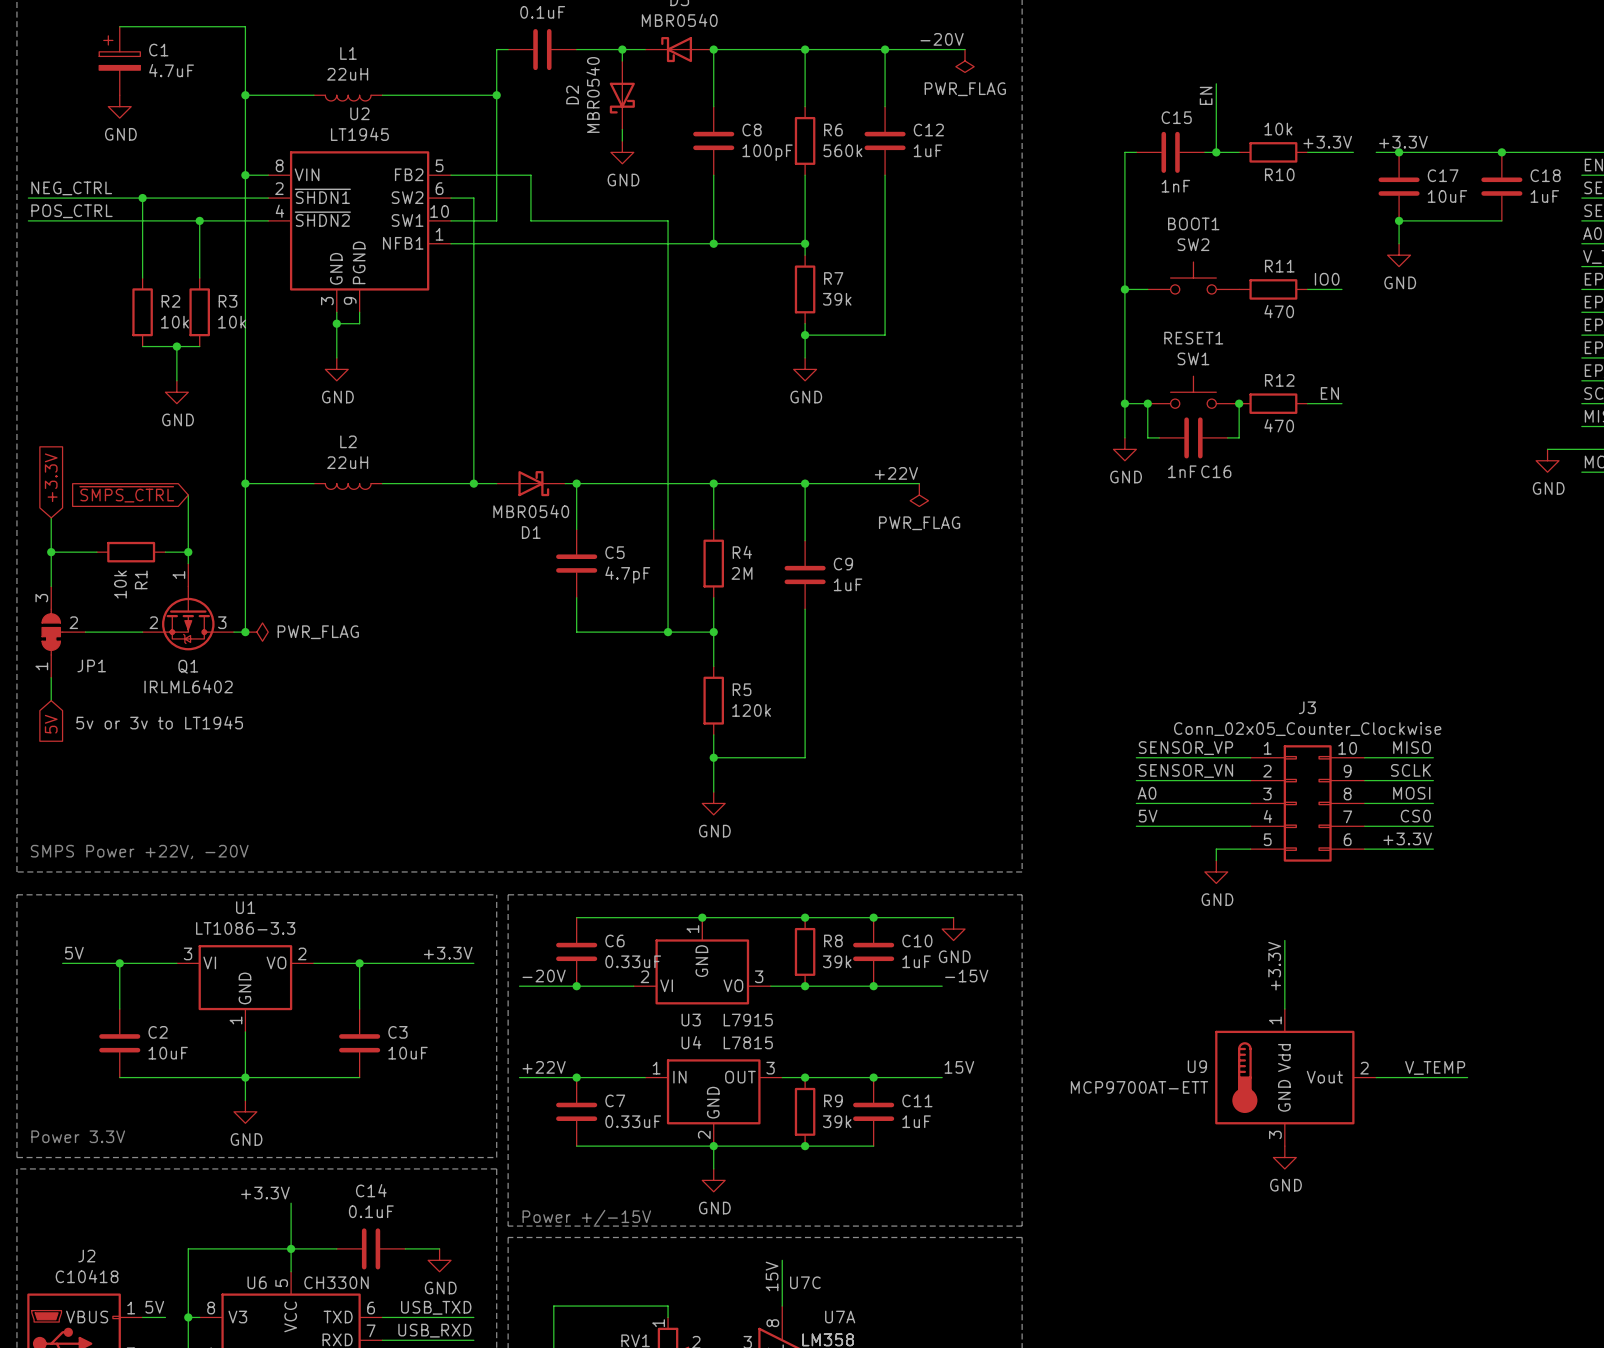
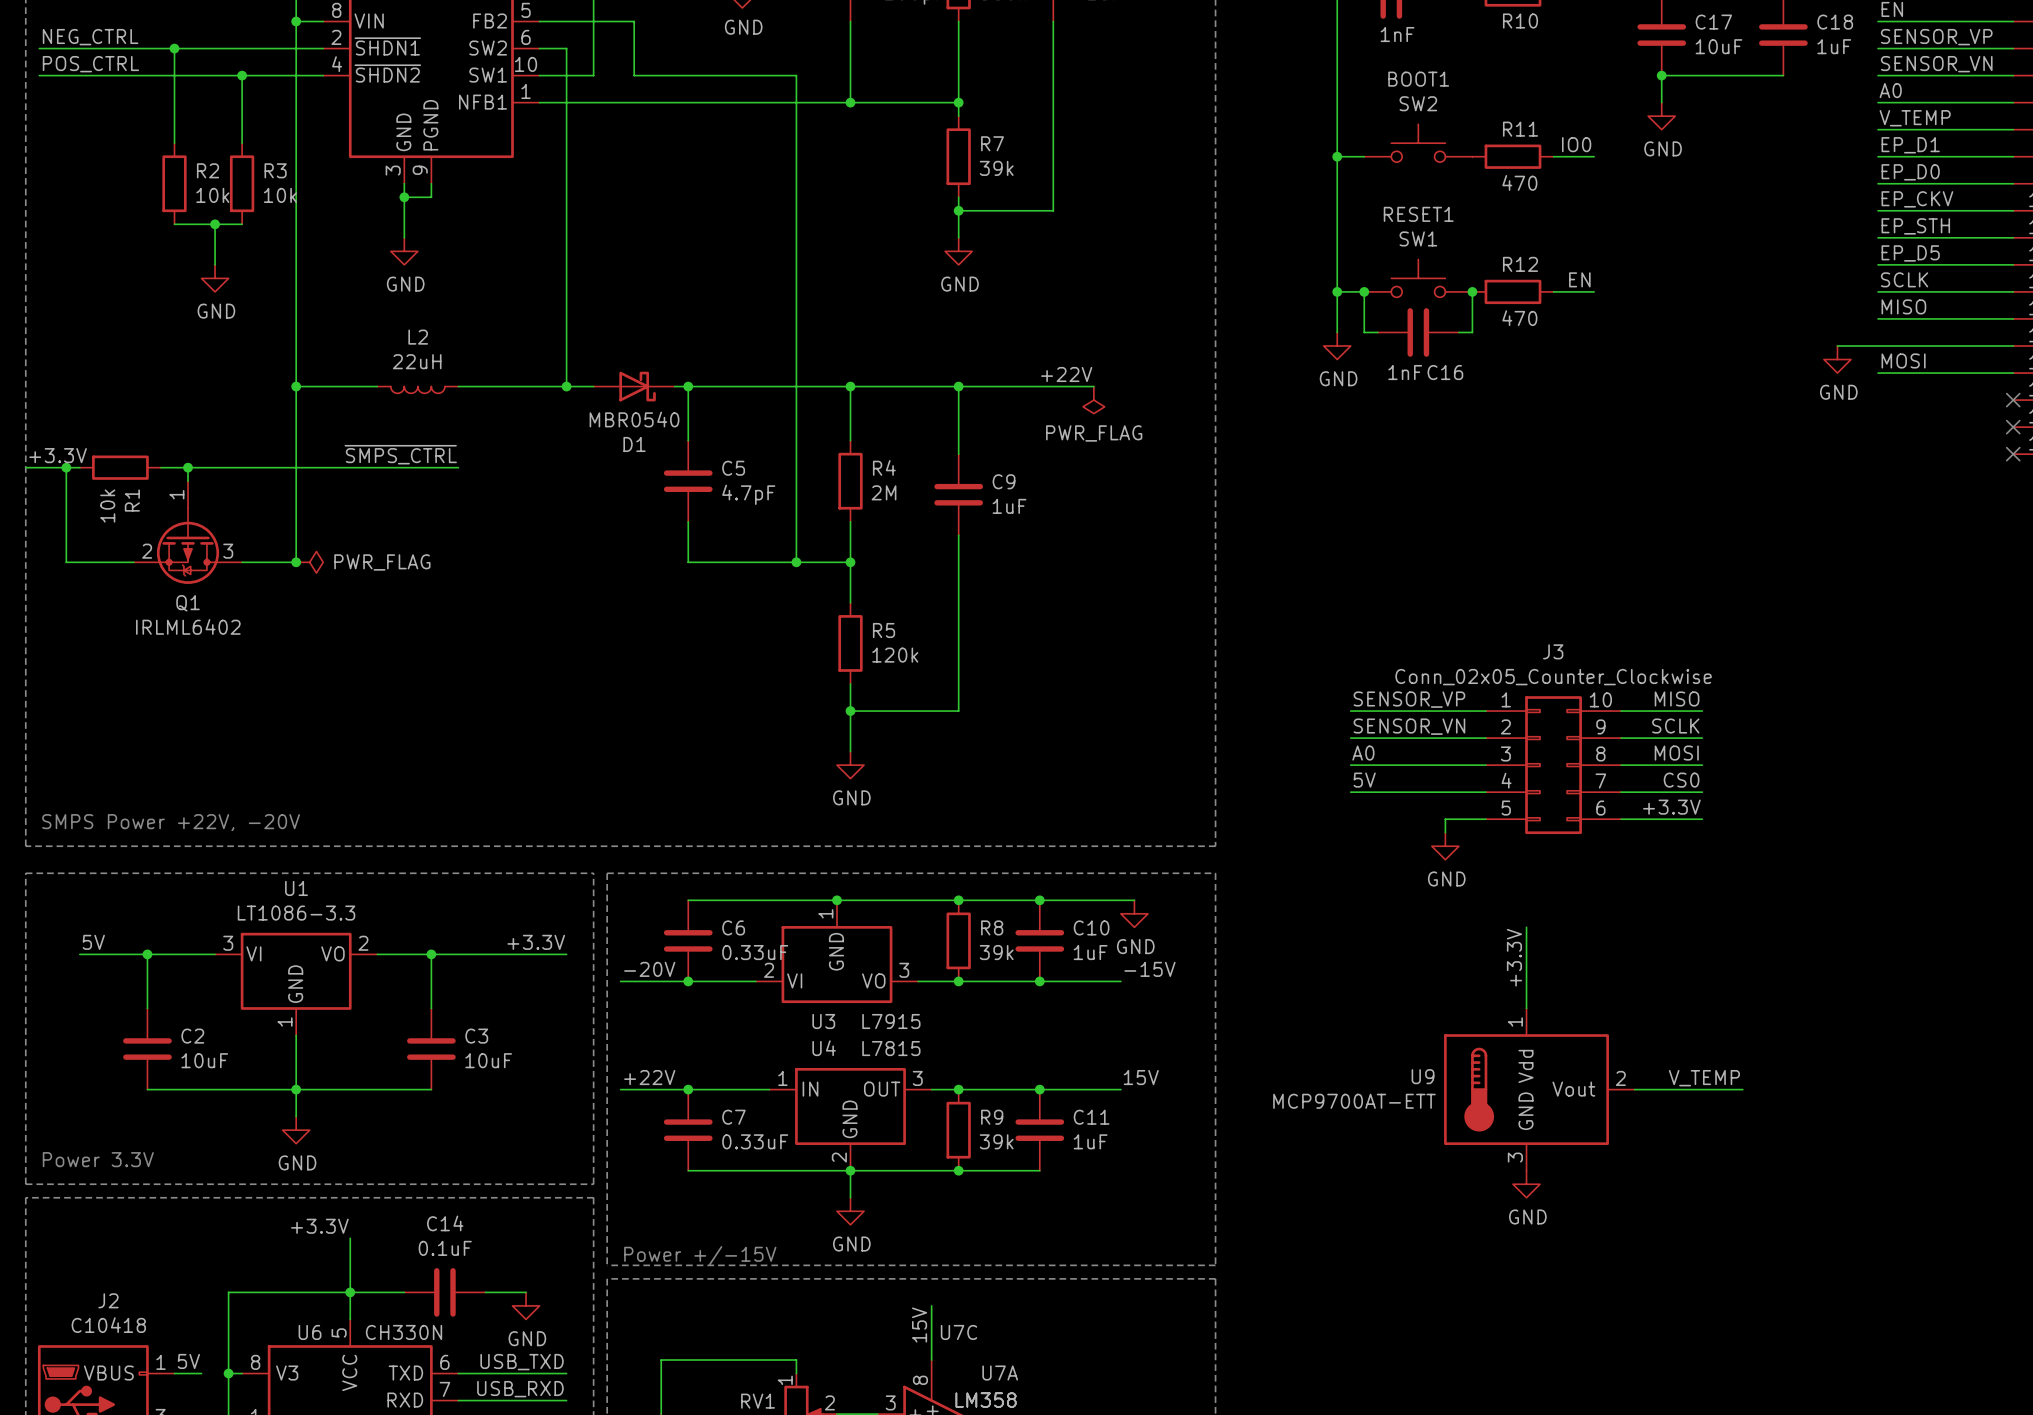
global label: +3.3V (51, 477) -> none
global label: ~{SMPS_CTRL} (126, 494) -> none
wire: (188, 495) (188, 563) -> none
wire: (51, 517) (51, 552) -> (25, 467) (66, 467)
label: none -> +3.3V (58, 455)
label: none -> ~{SMPS_CTRL} (400, 454)
wire: (62, 552) (96, 552) -> (160, 467) (201, 467)
R1 position: (131, 552) -> (120, 467)
wire: none -> (228, 467) (458, 467)
junction position: (188, 552) -> (188, 467)
Q1 position: (188, 606) -> (188, 532)
JP1: 5v or 3v to LT1945 (63, 632) -> none
wire: (51, 677) (51, 700) -> none
global label: 5V (51, 724) -> none

